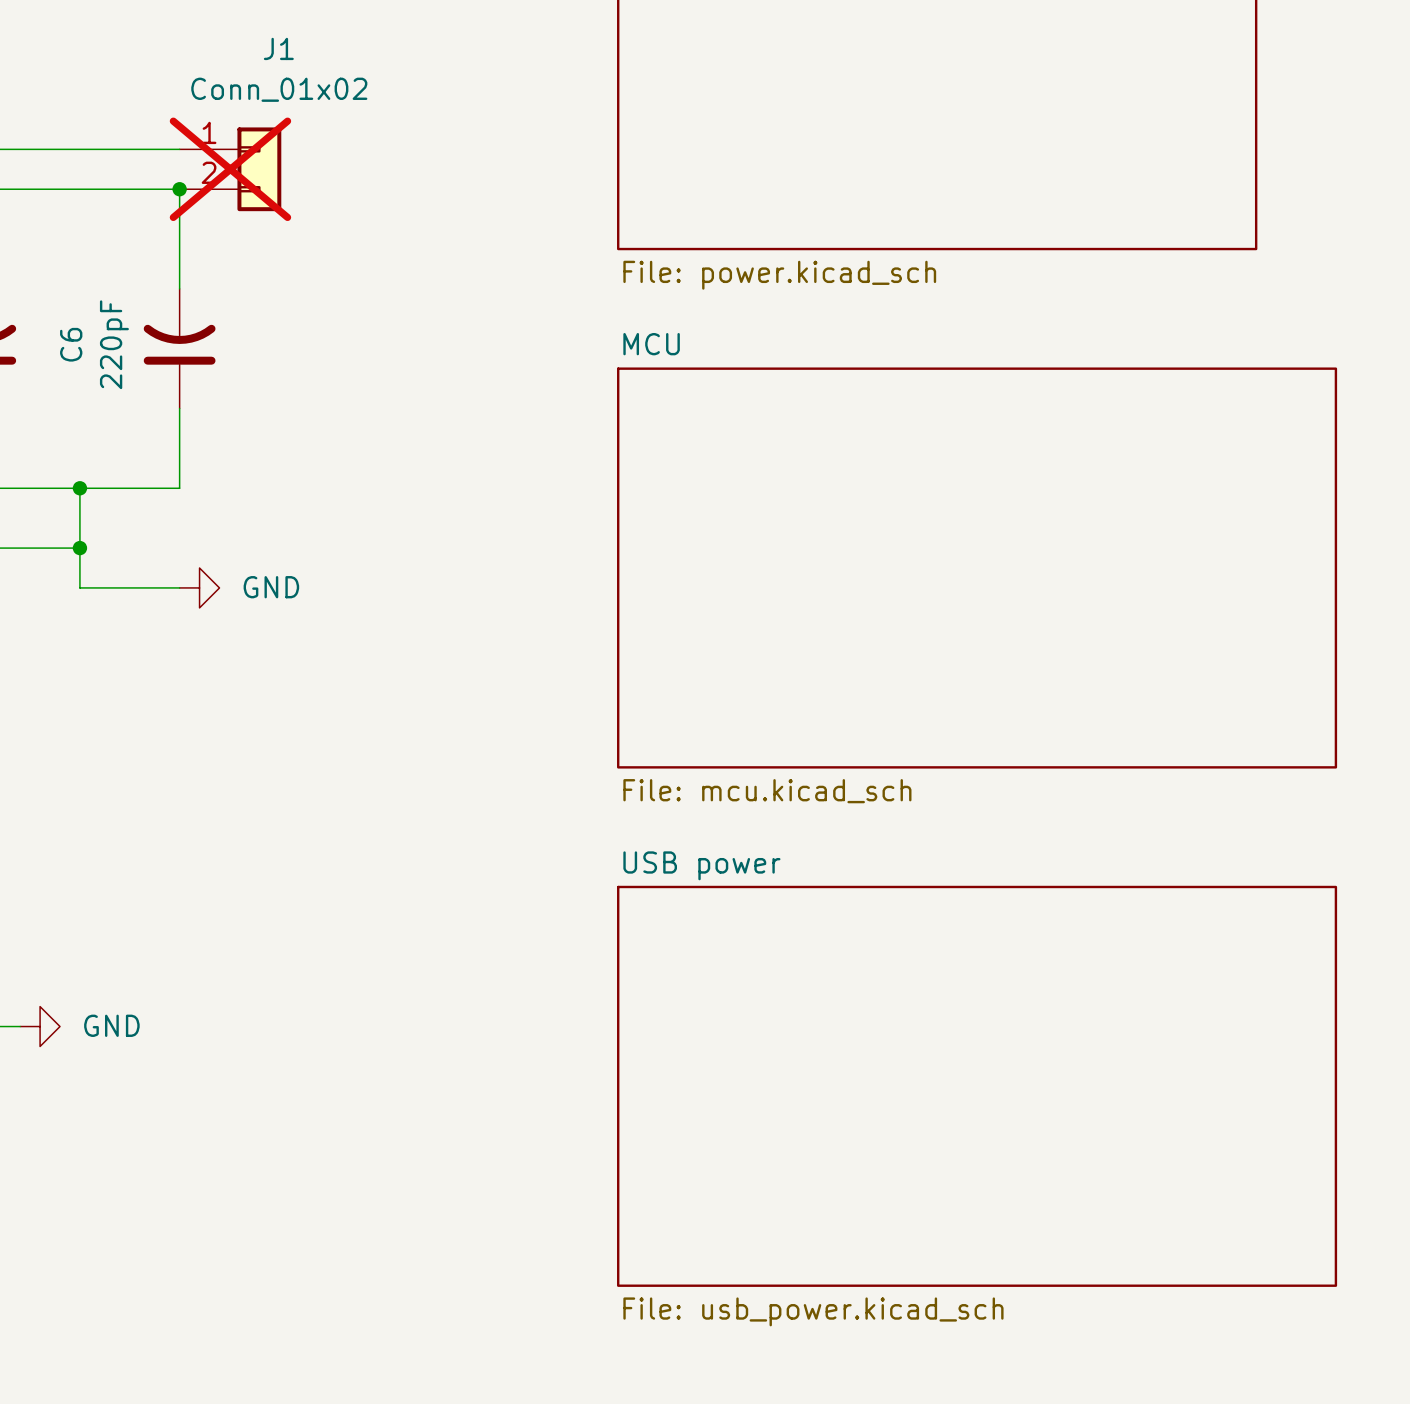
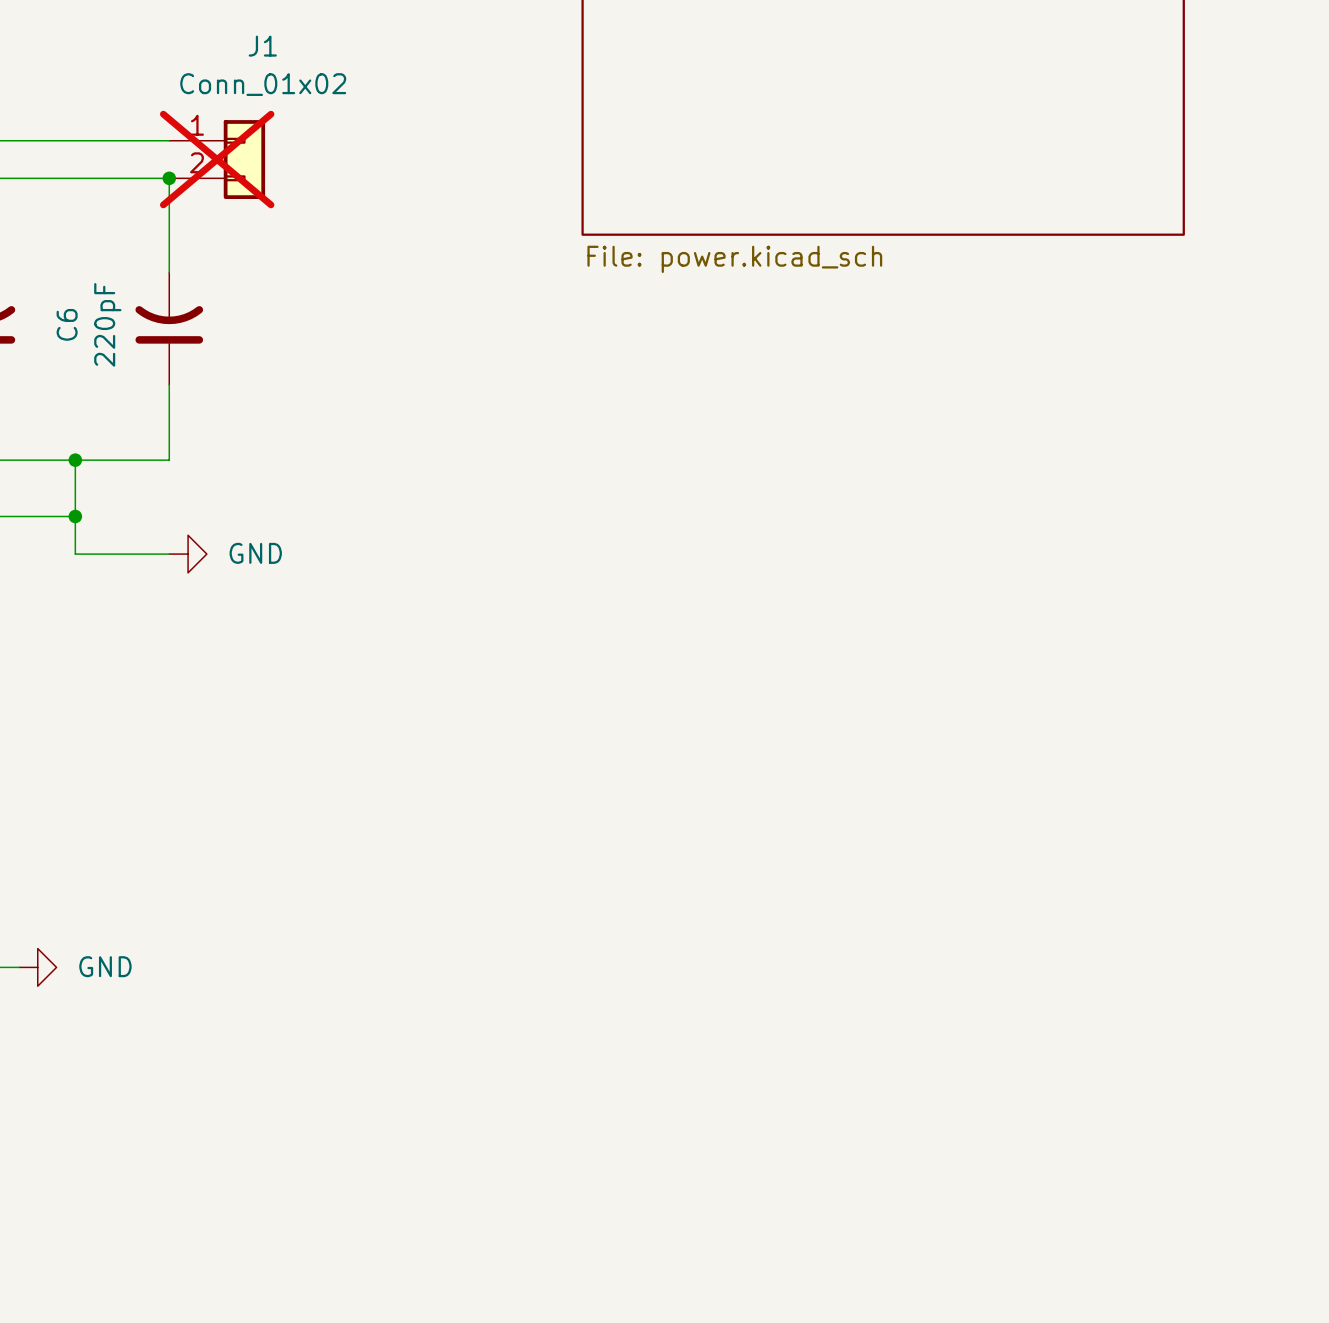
sheet MCU: File: mcu.kicad_sch (977, 568) -> none
sheet USB power: File: usb_power.kicad_sch (977, 1086) -> none

